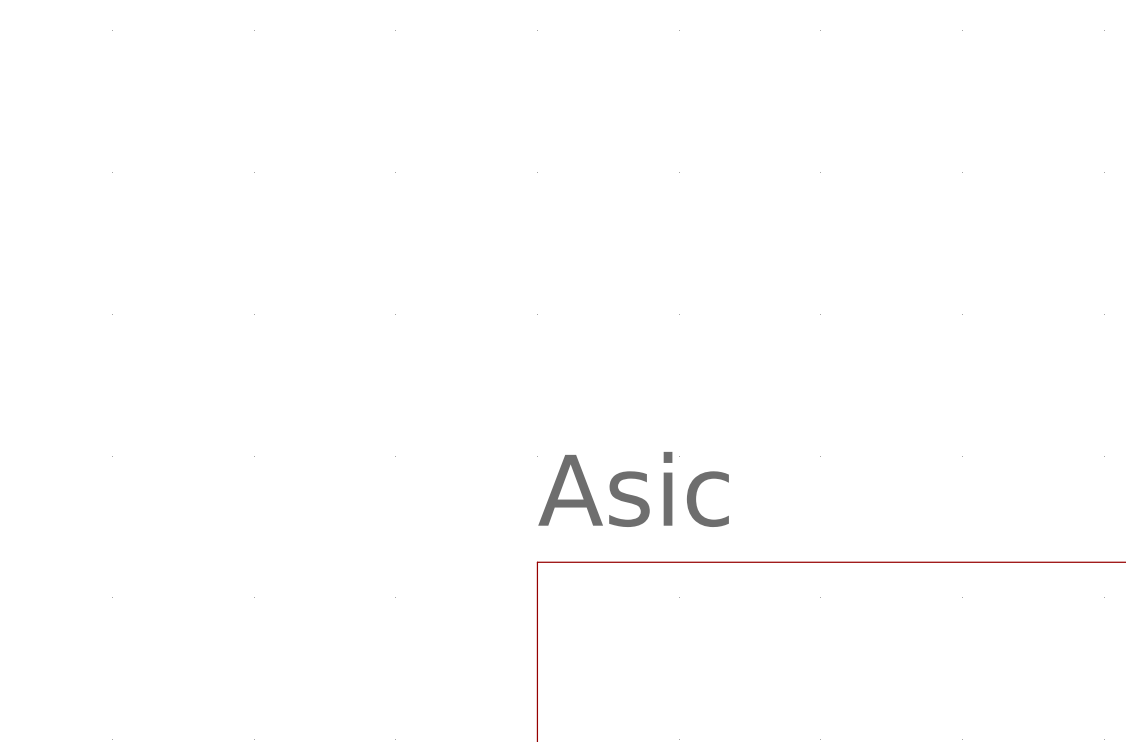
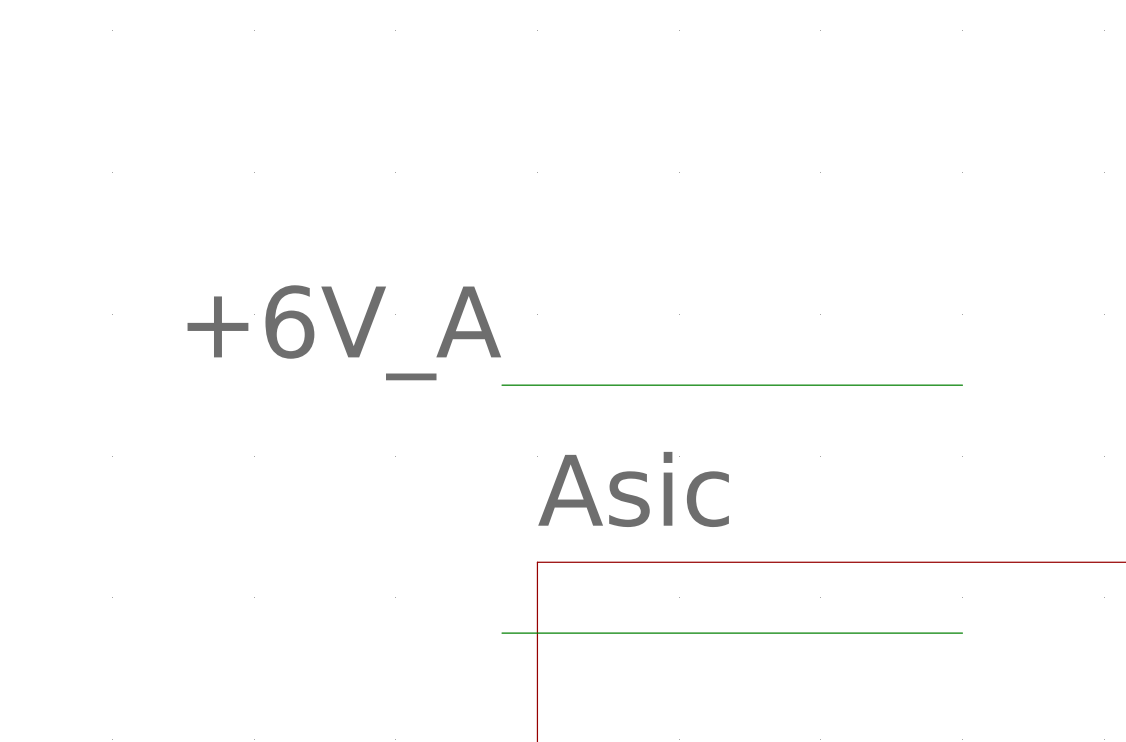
label: none -> +6V_A (344, 332)
wire: none -> (502, 385) (962, 385)
wire: none -> (502, 633) (962, 633)

